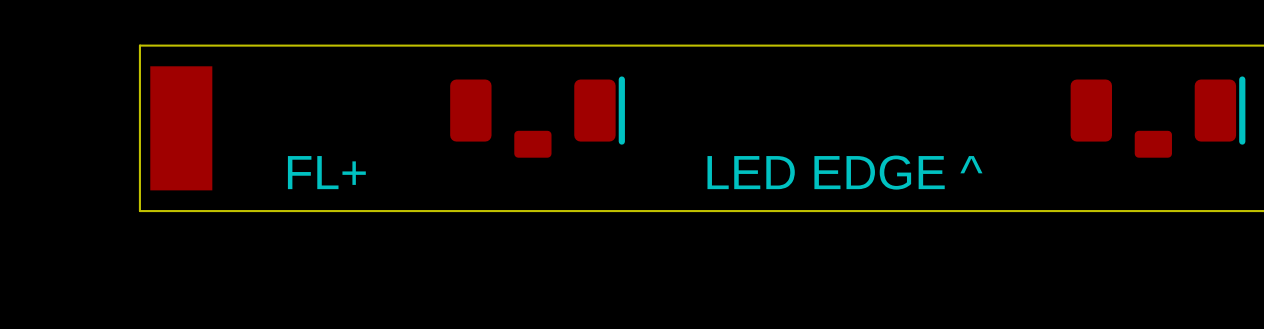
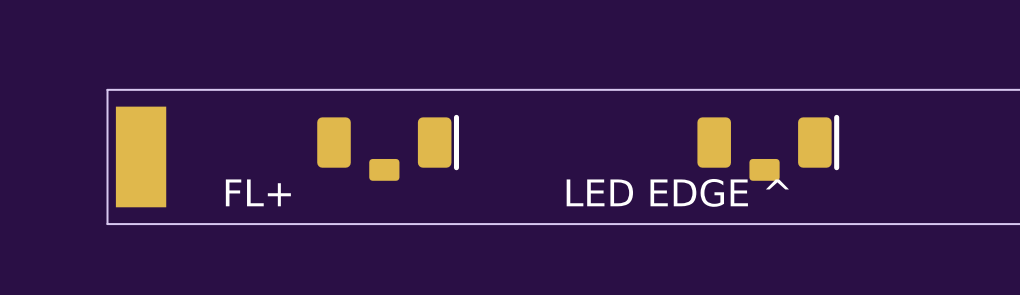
part position: (537, 117) -> (388, 147)
part position: (1158, 117) -> (768, 147)

